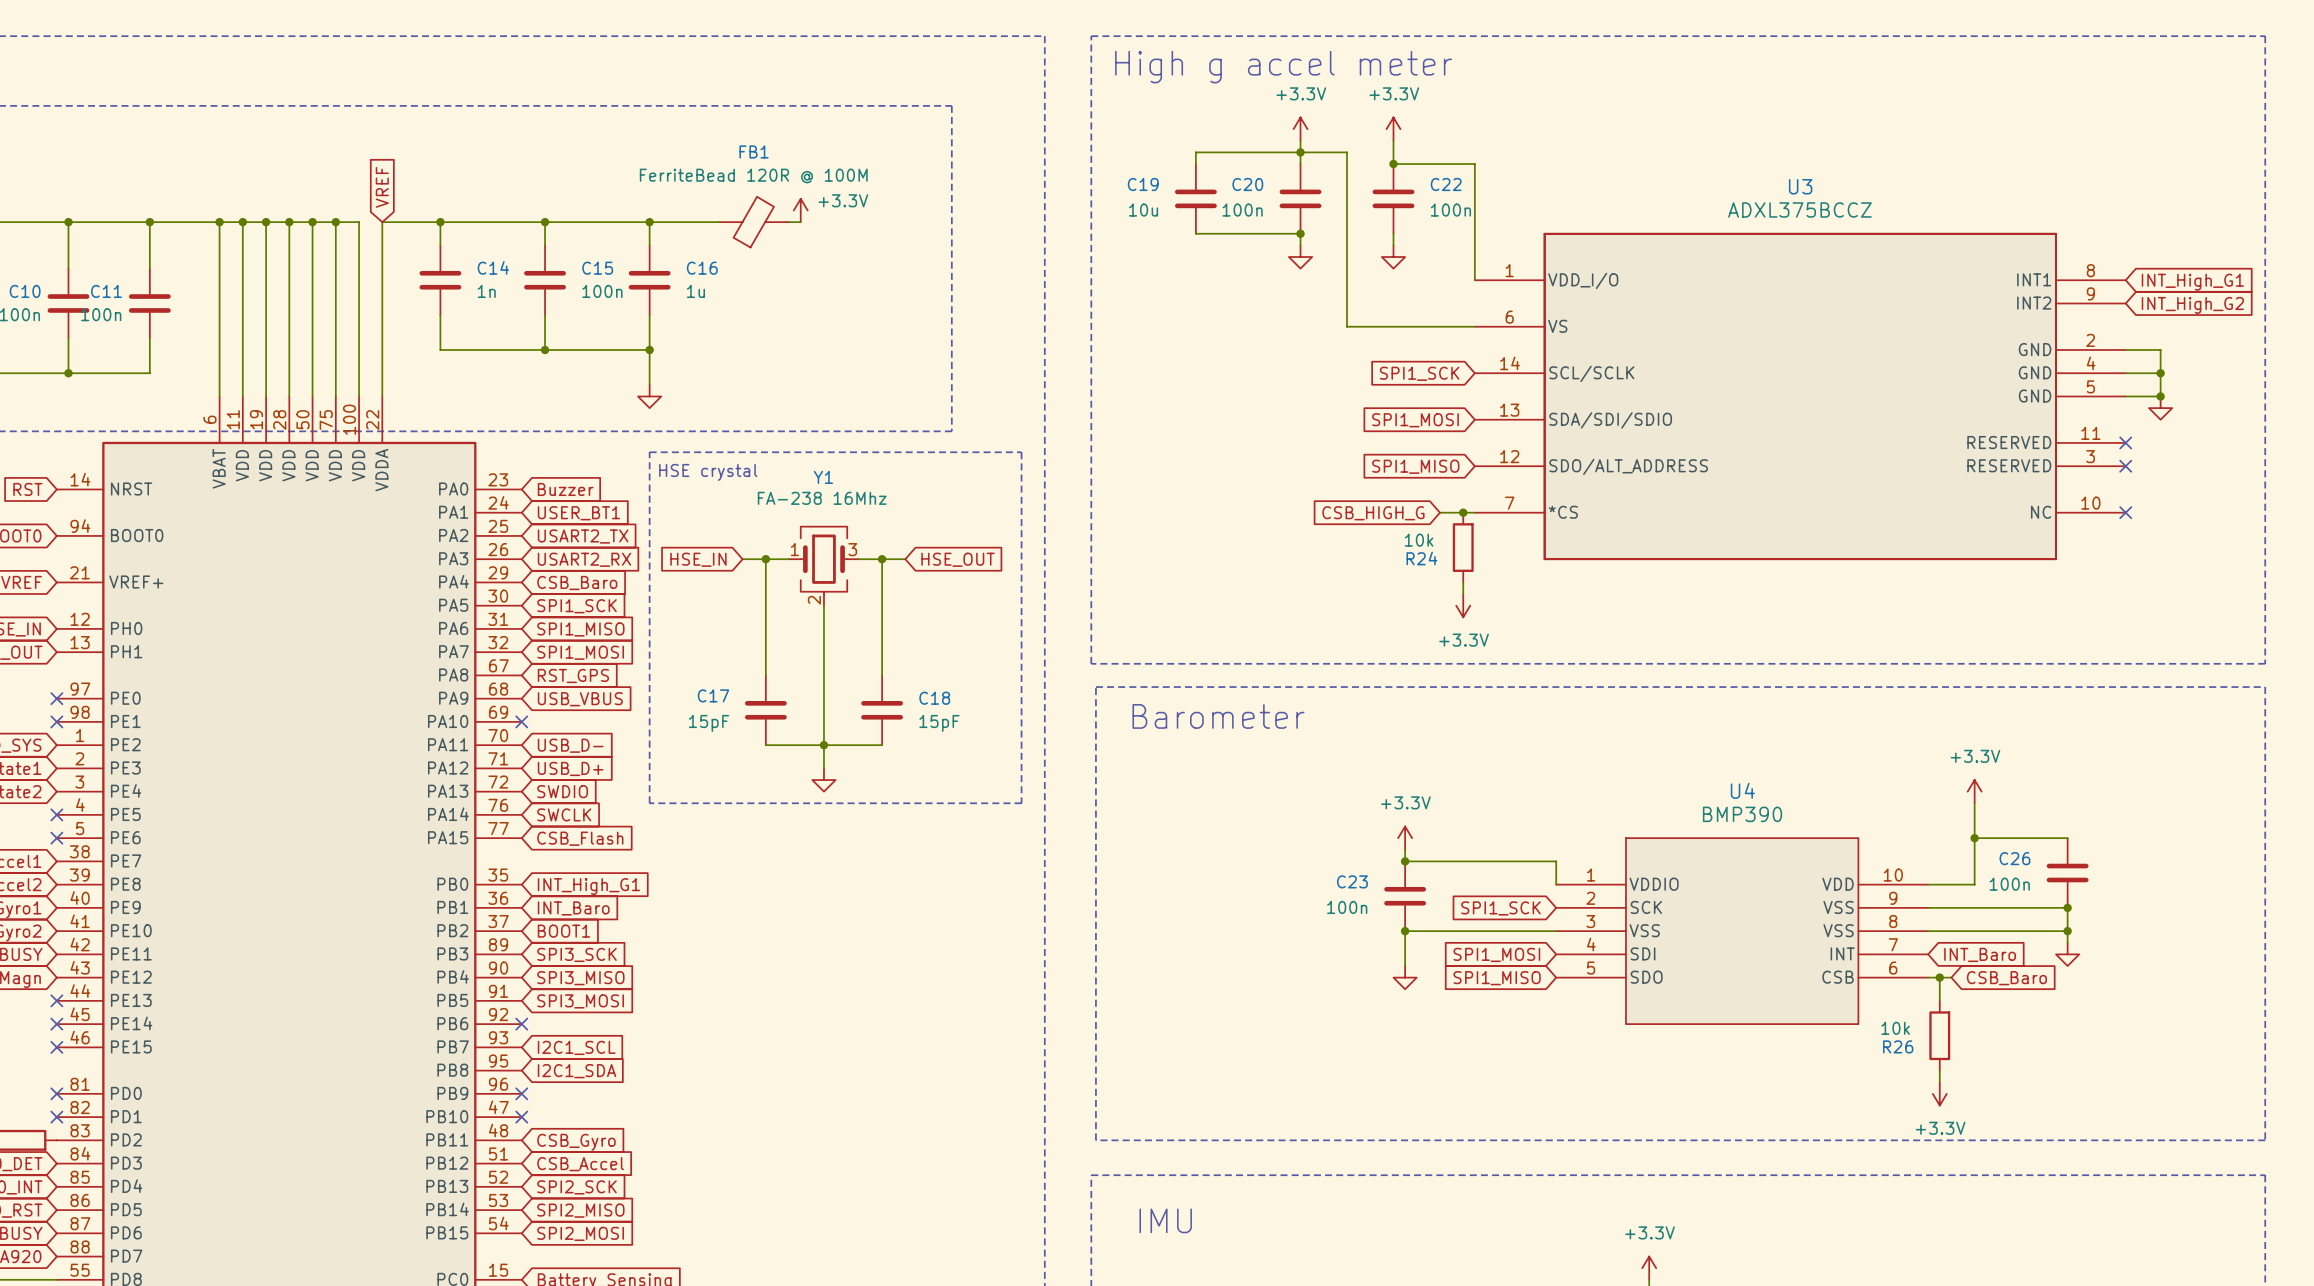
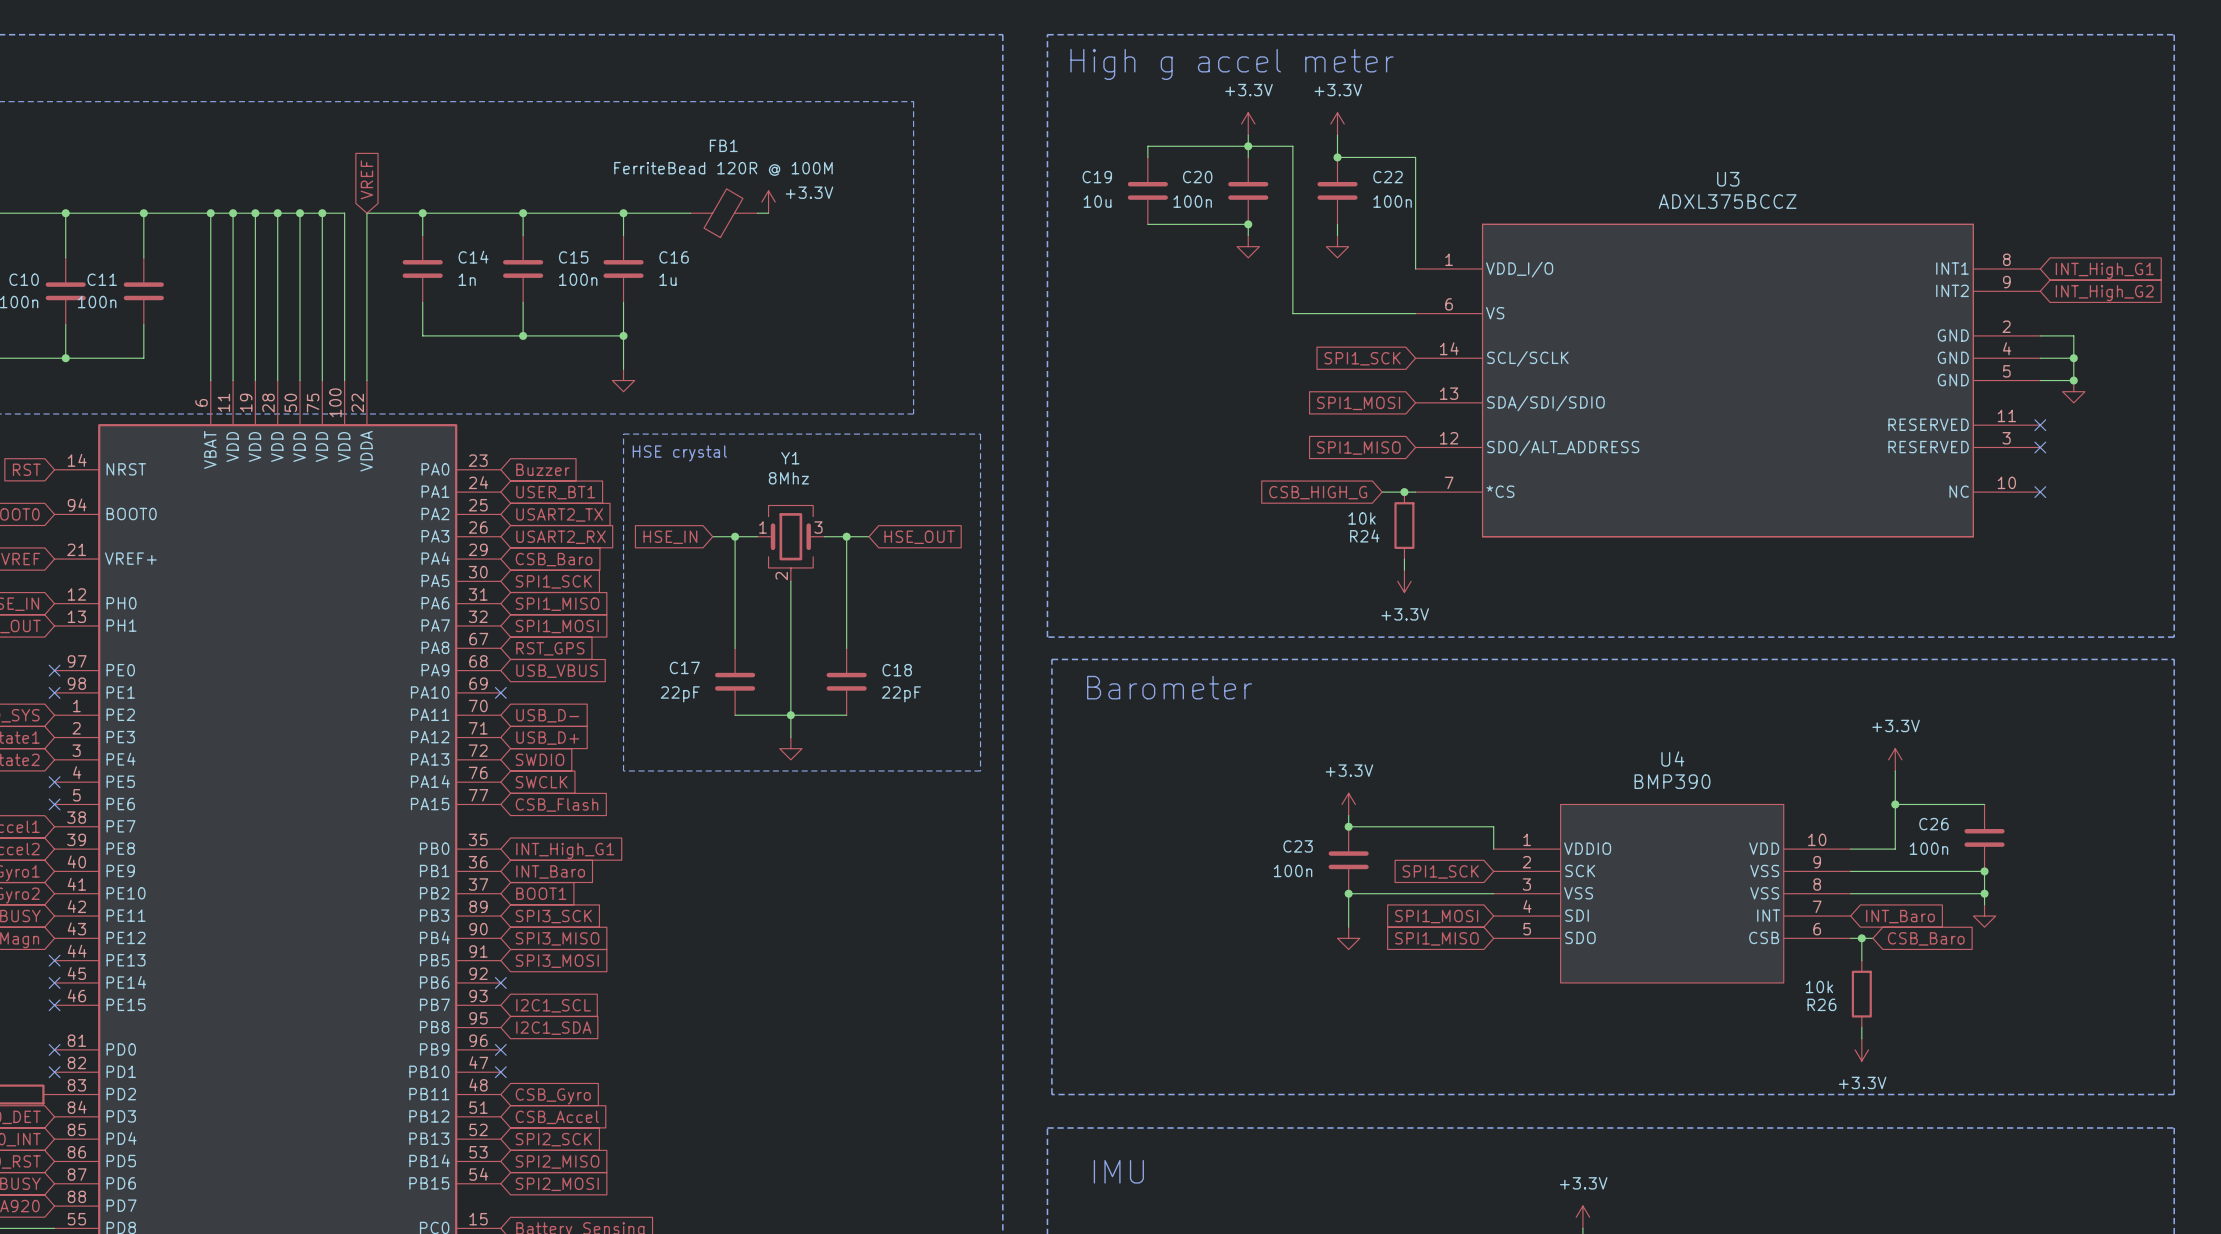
Y1 value: FA-238 16Mhz (822, 498) -> 8Mhz (788, 478)
C17 value: 15pF (709, 723) -> 22pF (680, 694)
C18 value: 15pF (939, 723) -> 22pF (901, 694)

